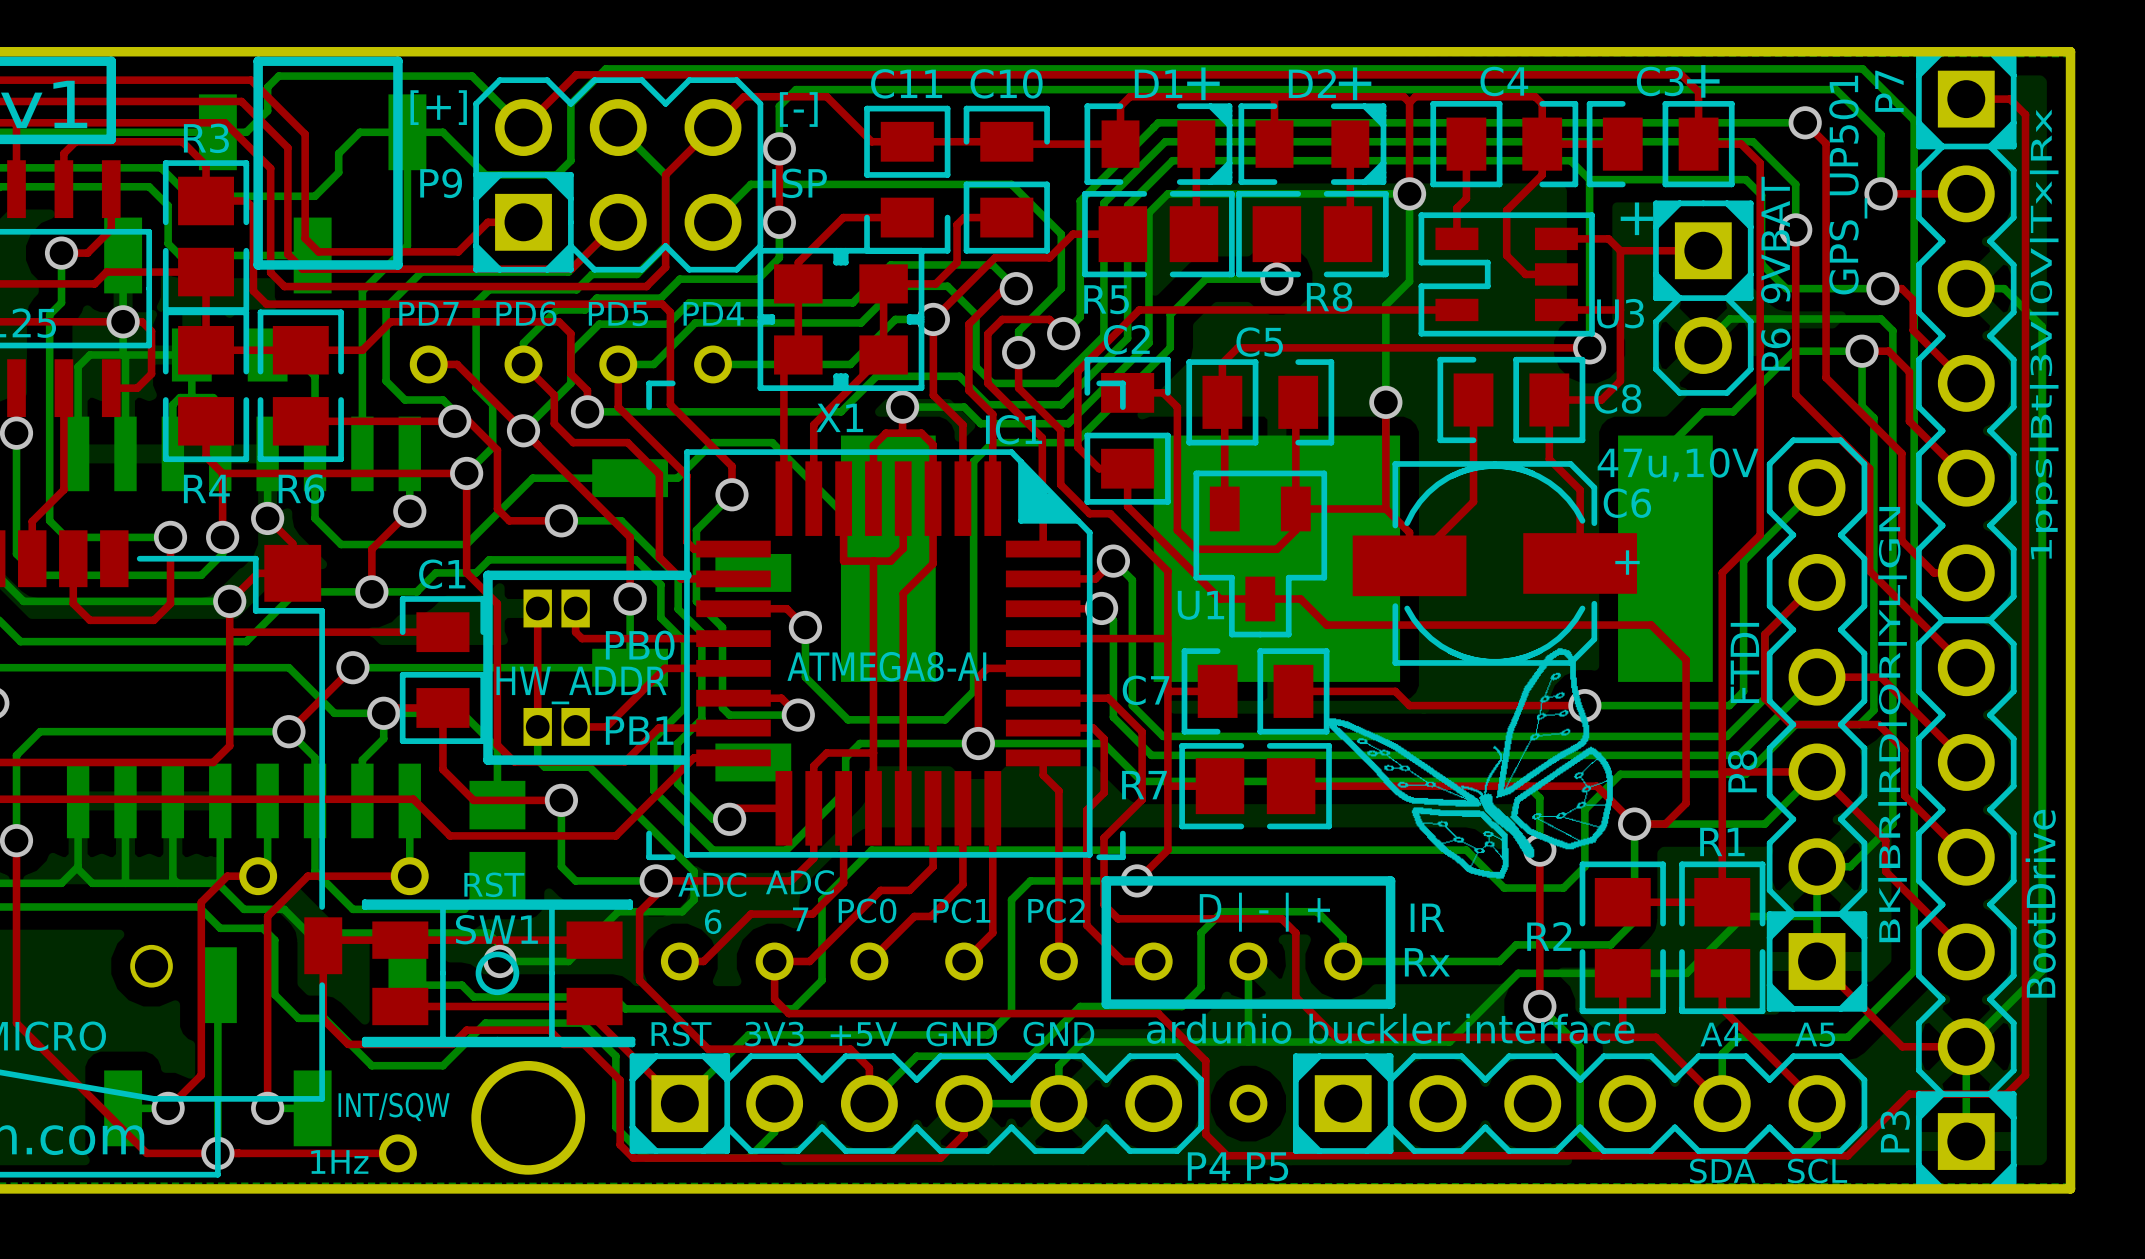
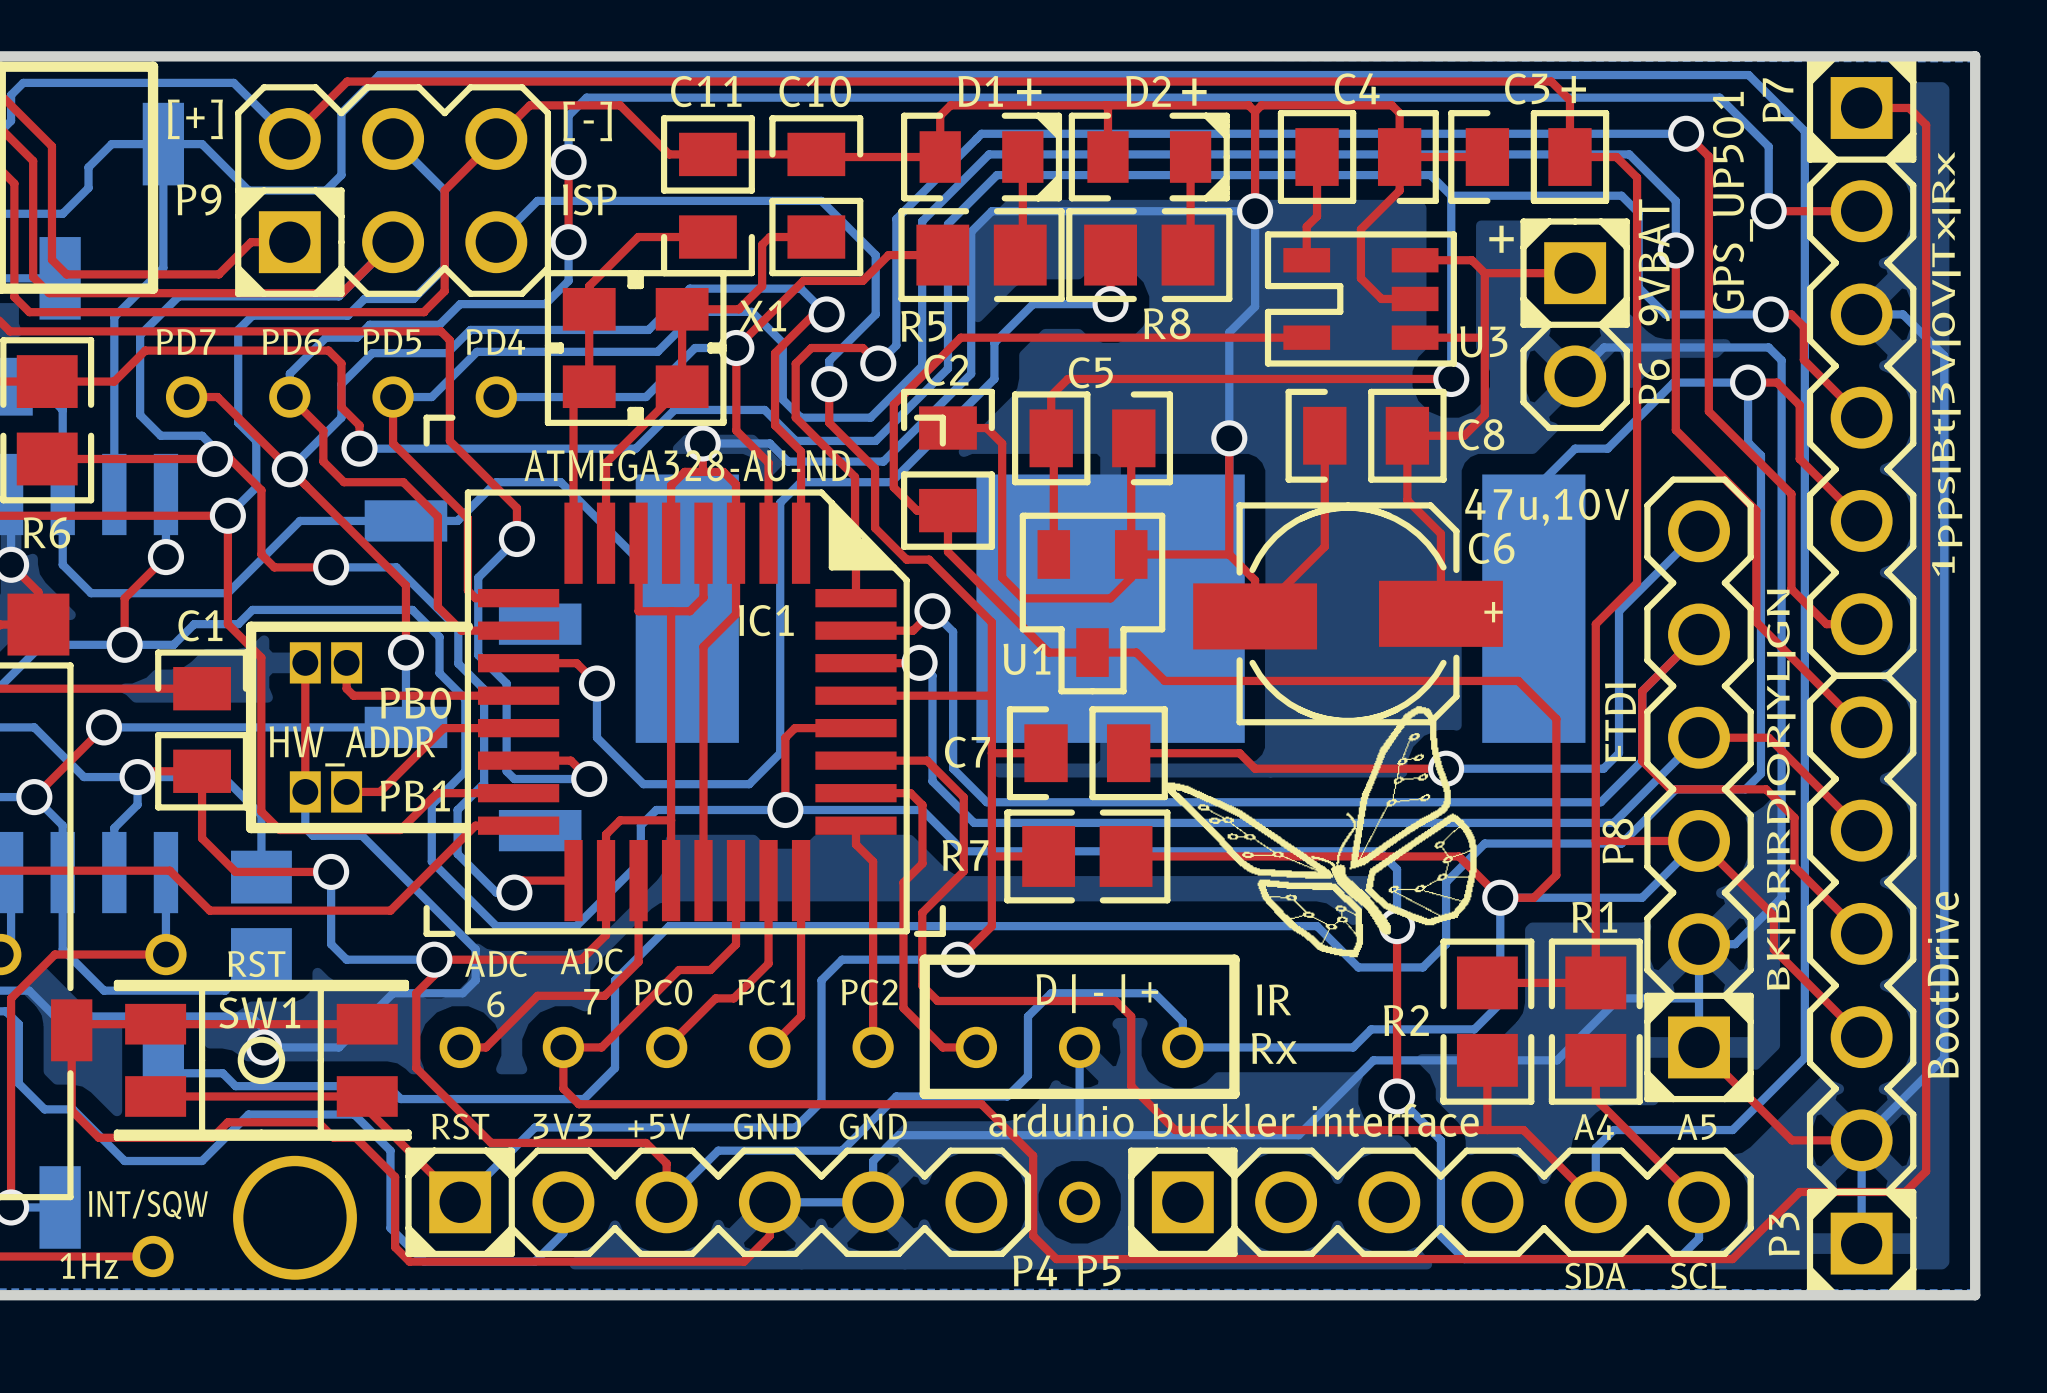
X1 name position: X1 (839, 417) -> X1 (762, 315)
IC1 name position: IC1 (1014, 429) -> IC1 (766, 620)
IC1 value: ATMEGA8-AI (886, 666) -> ATMEGA328-AU-ND (687, 465)

